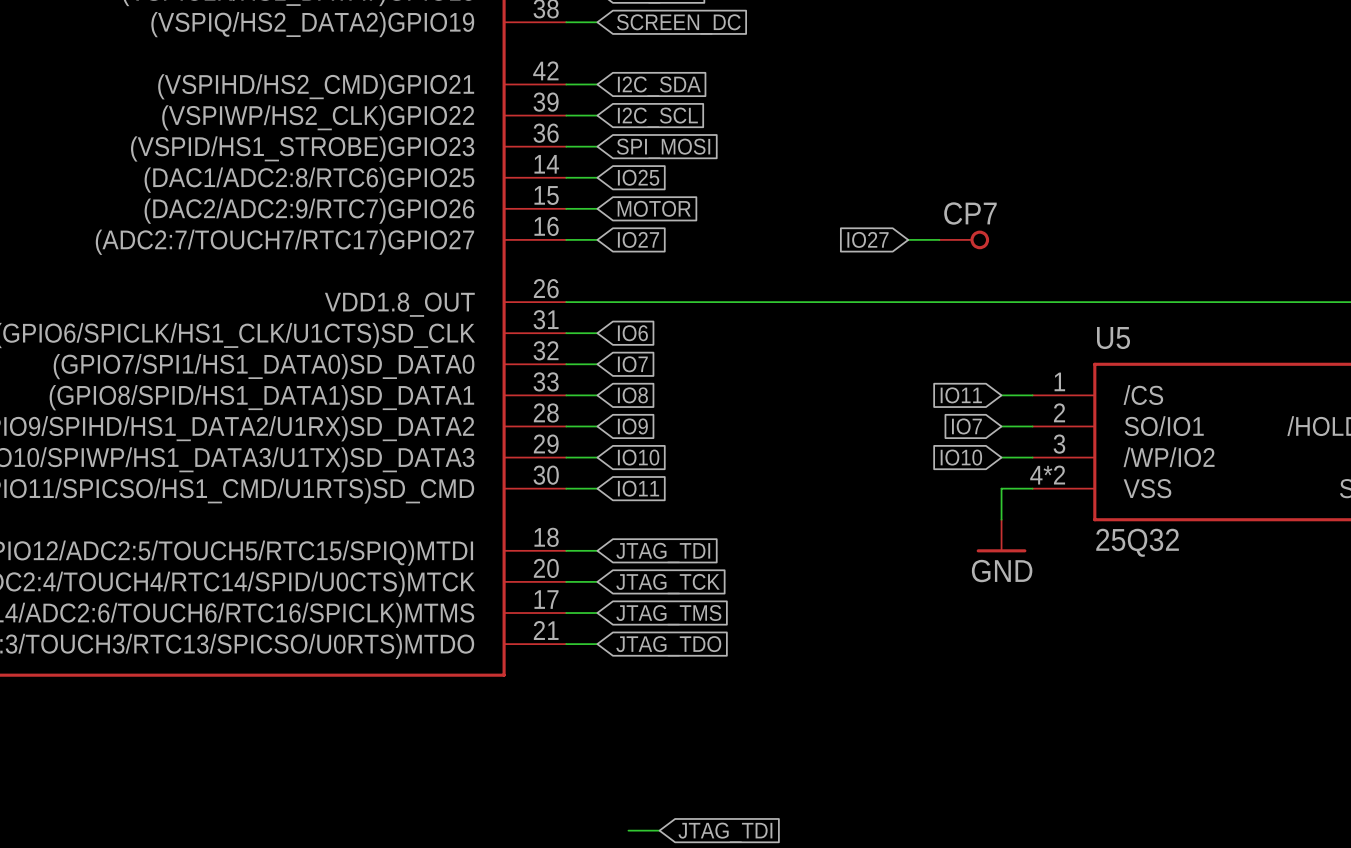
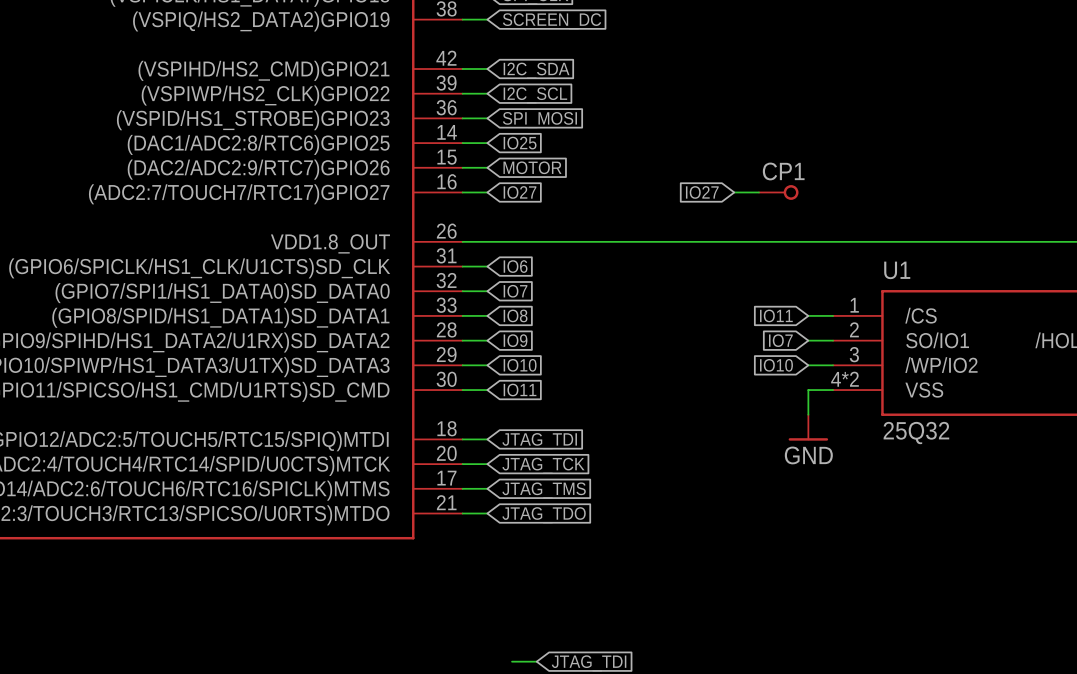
CP7 name: CP7 (970, 213) -> CP1 (783, 171)
U5 name: U5 (1113, 338) -> U1 (897, 270)

